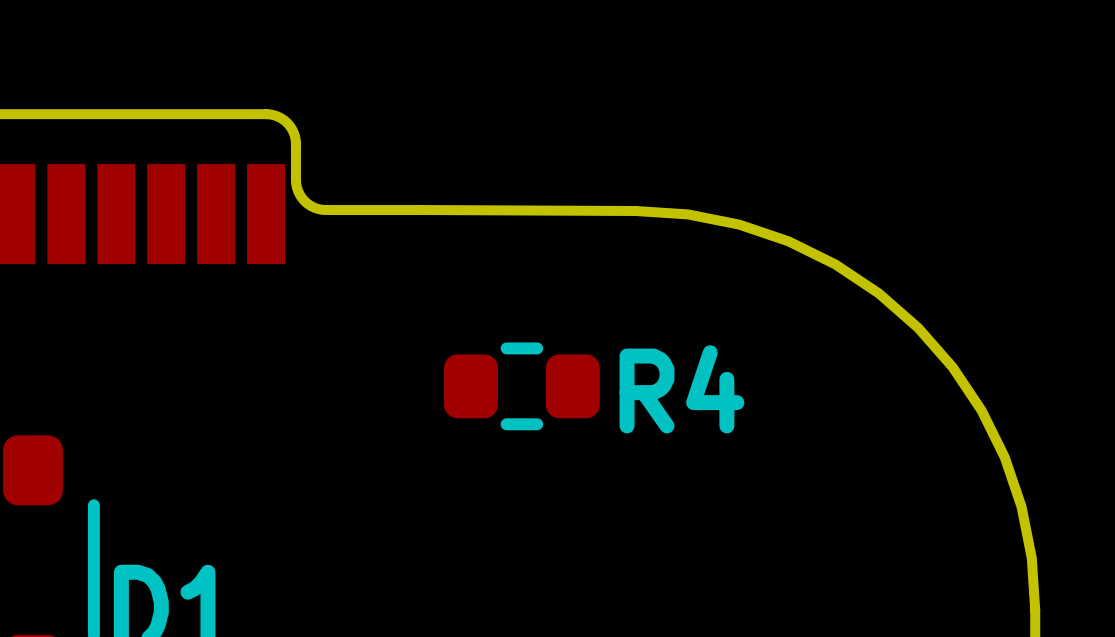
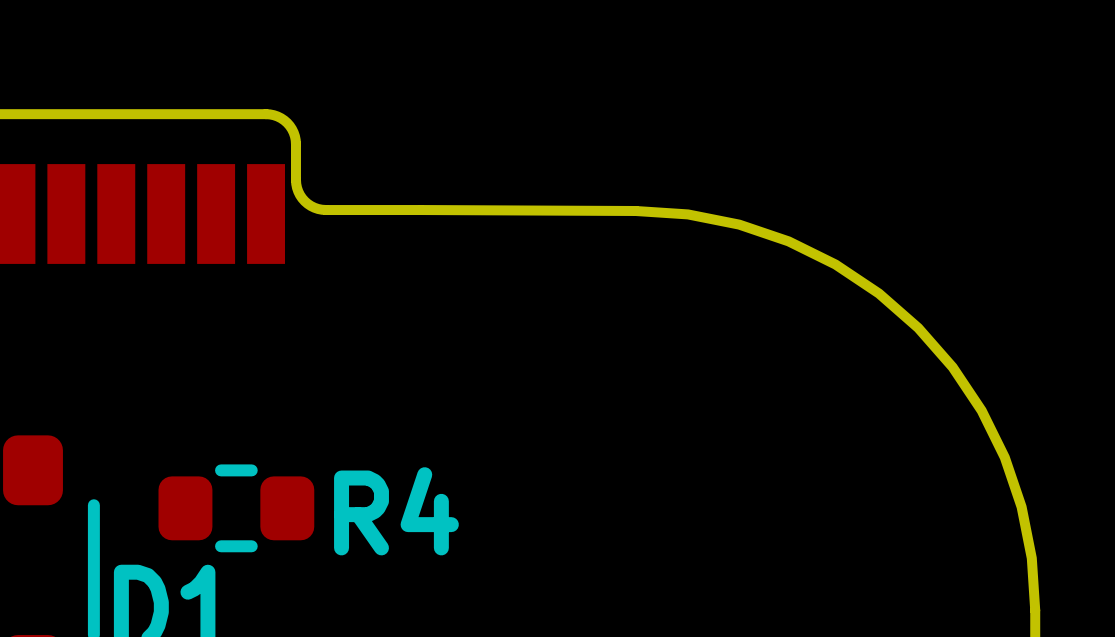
R4 position: (521, 386) -> (236, 508)

